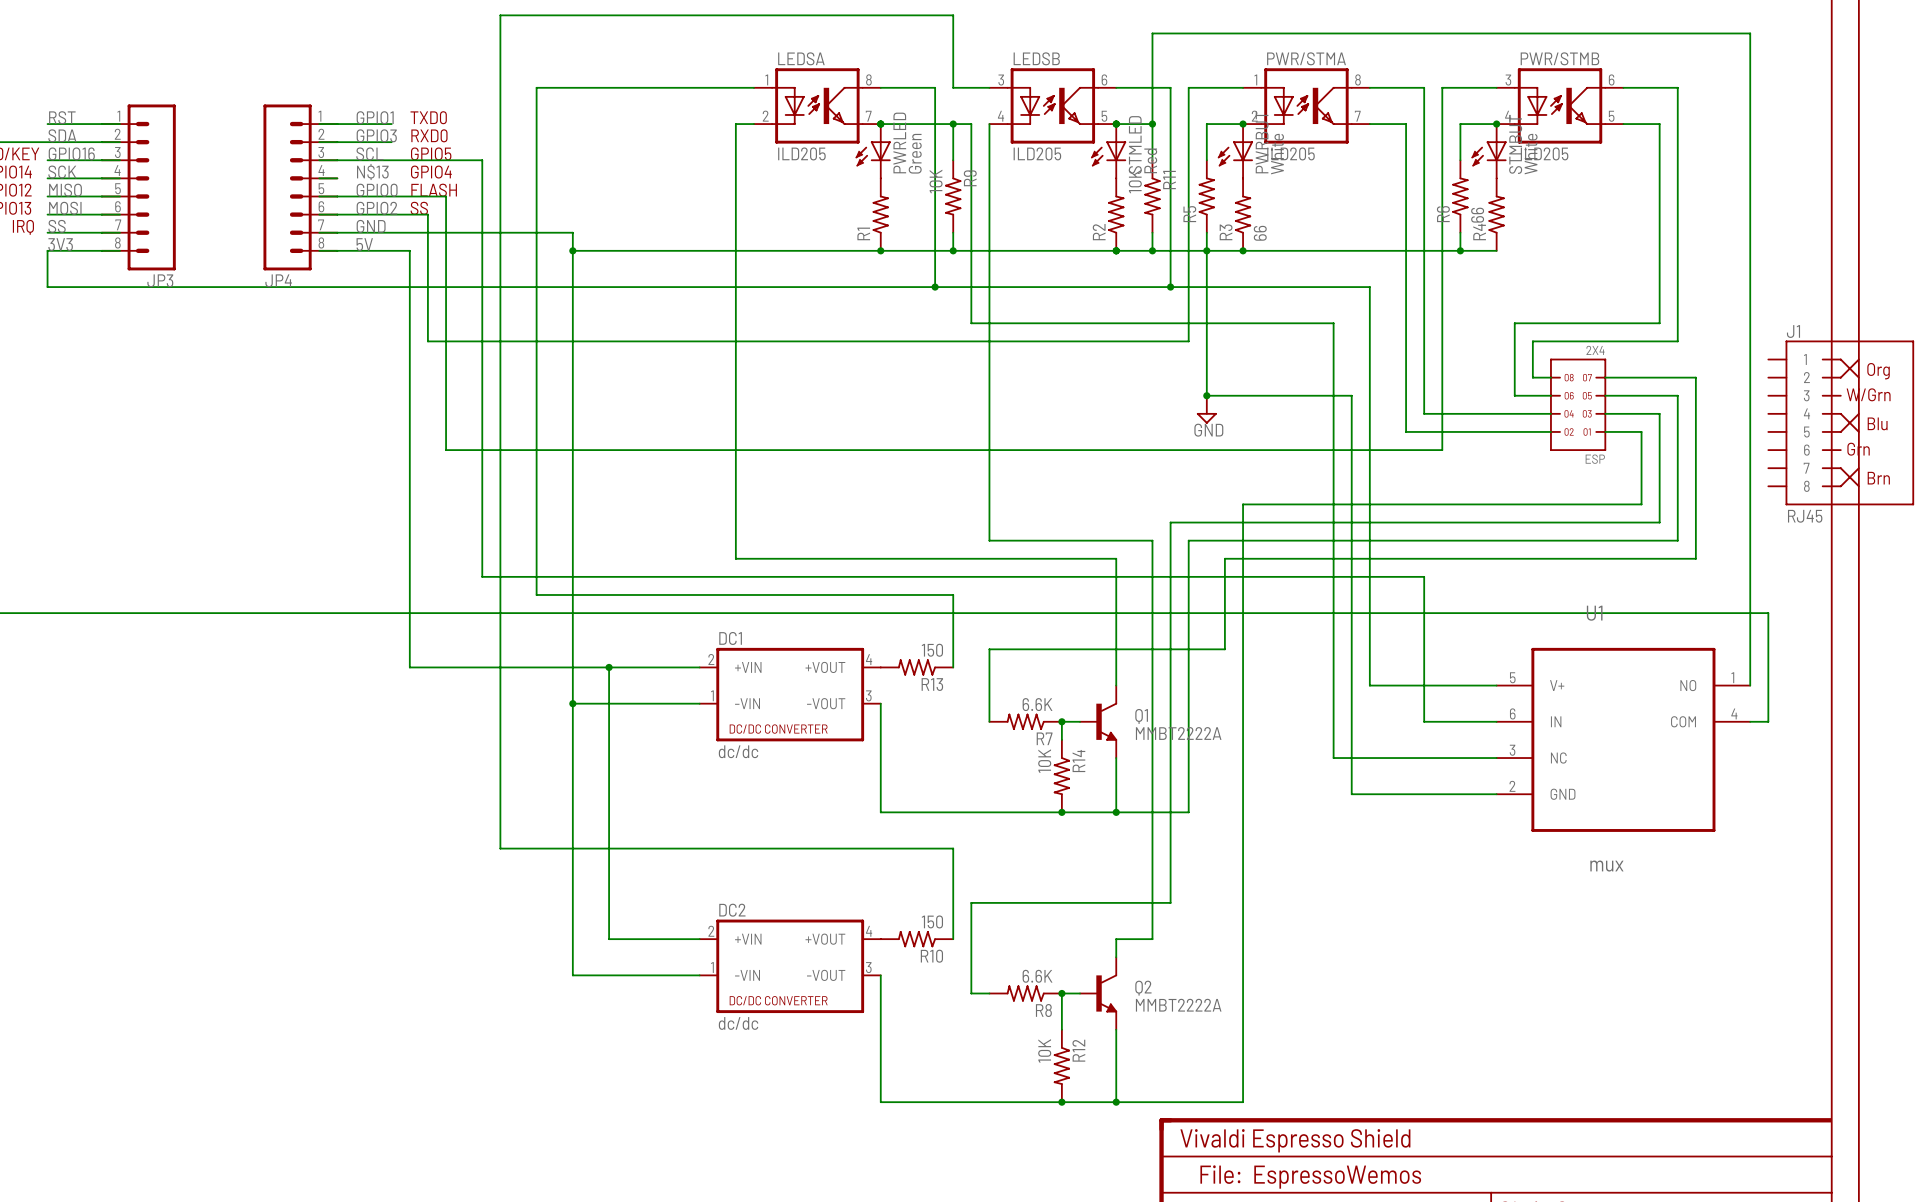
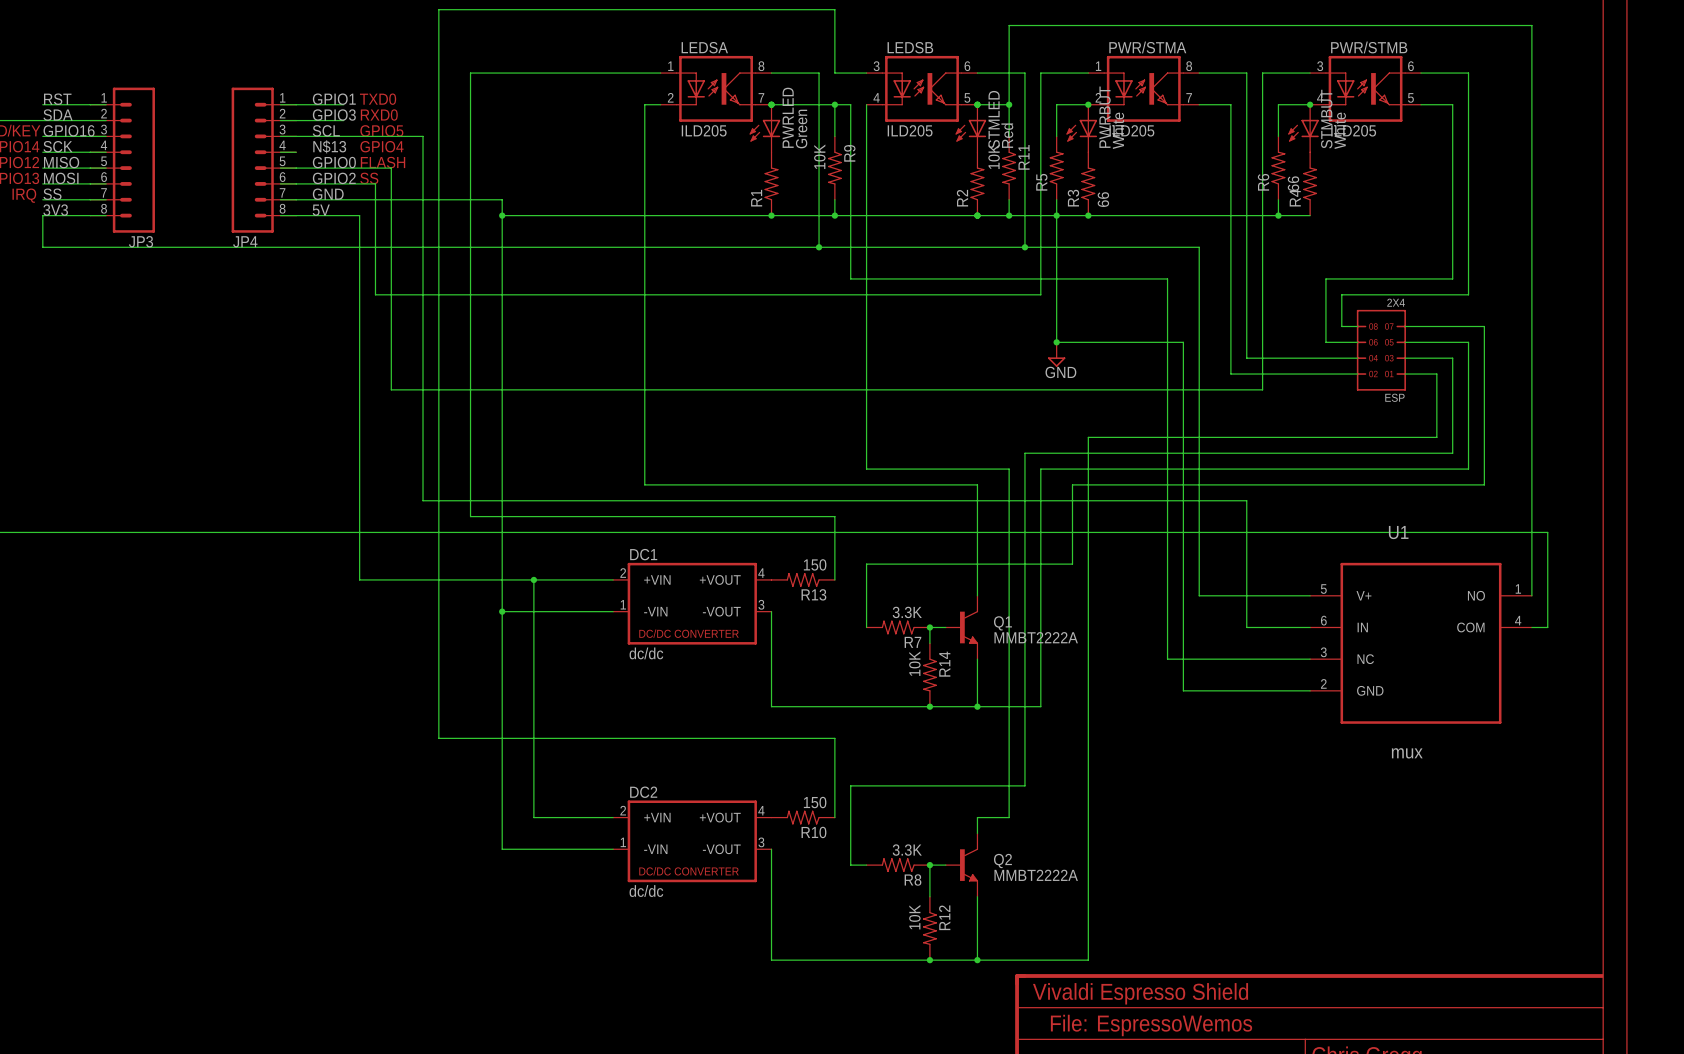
J1: RJ45 (1841, 422) -> none
R7 value: 6.6K (1037, 704) -> 3.3K (907, 612)
R8 value: 6.6K (1037, 976) -> 3.3K (907, 850)

